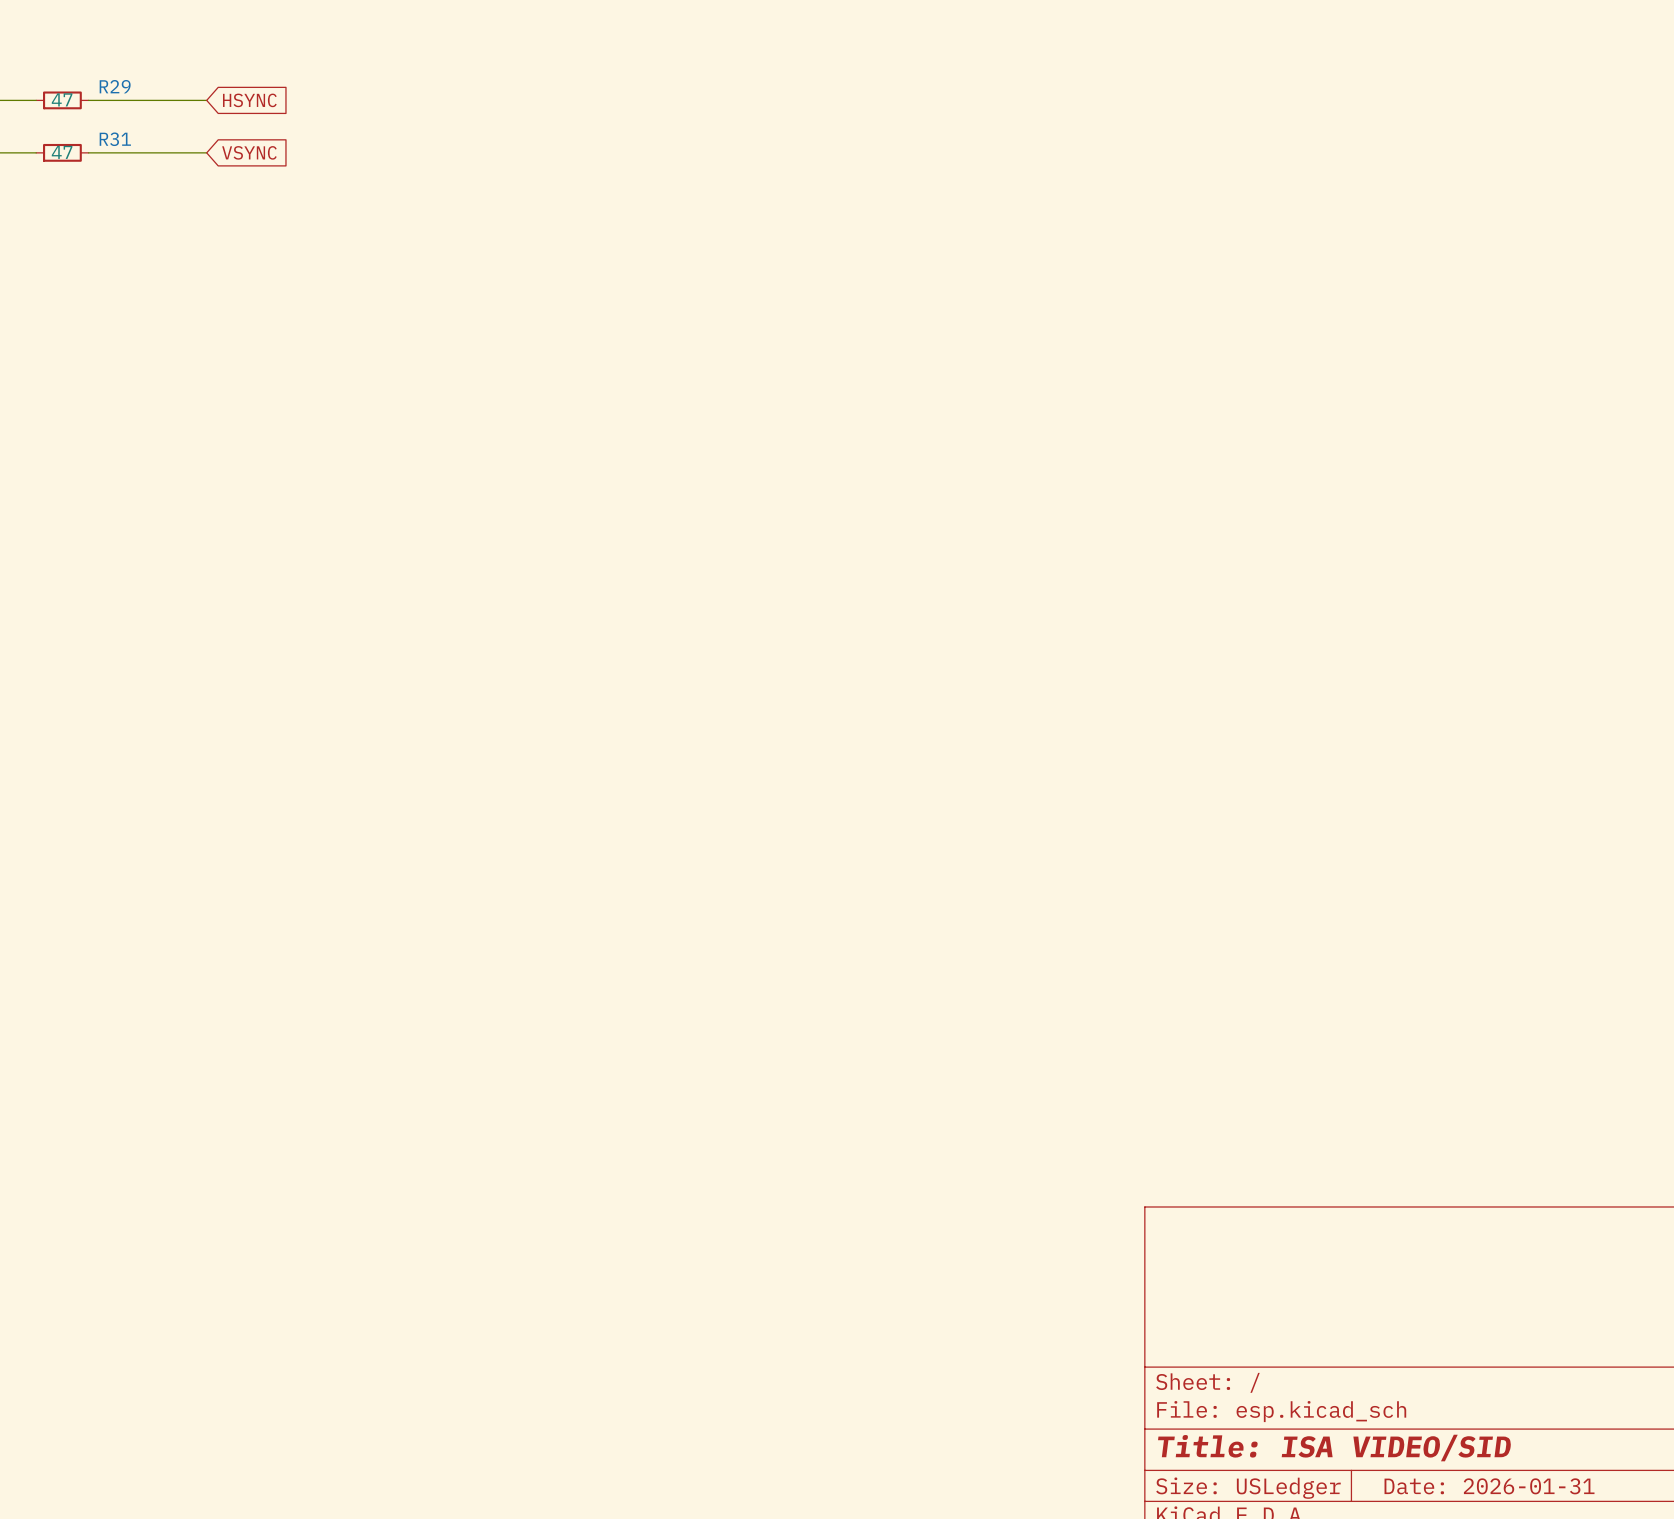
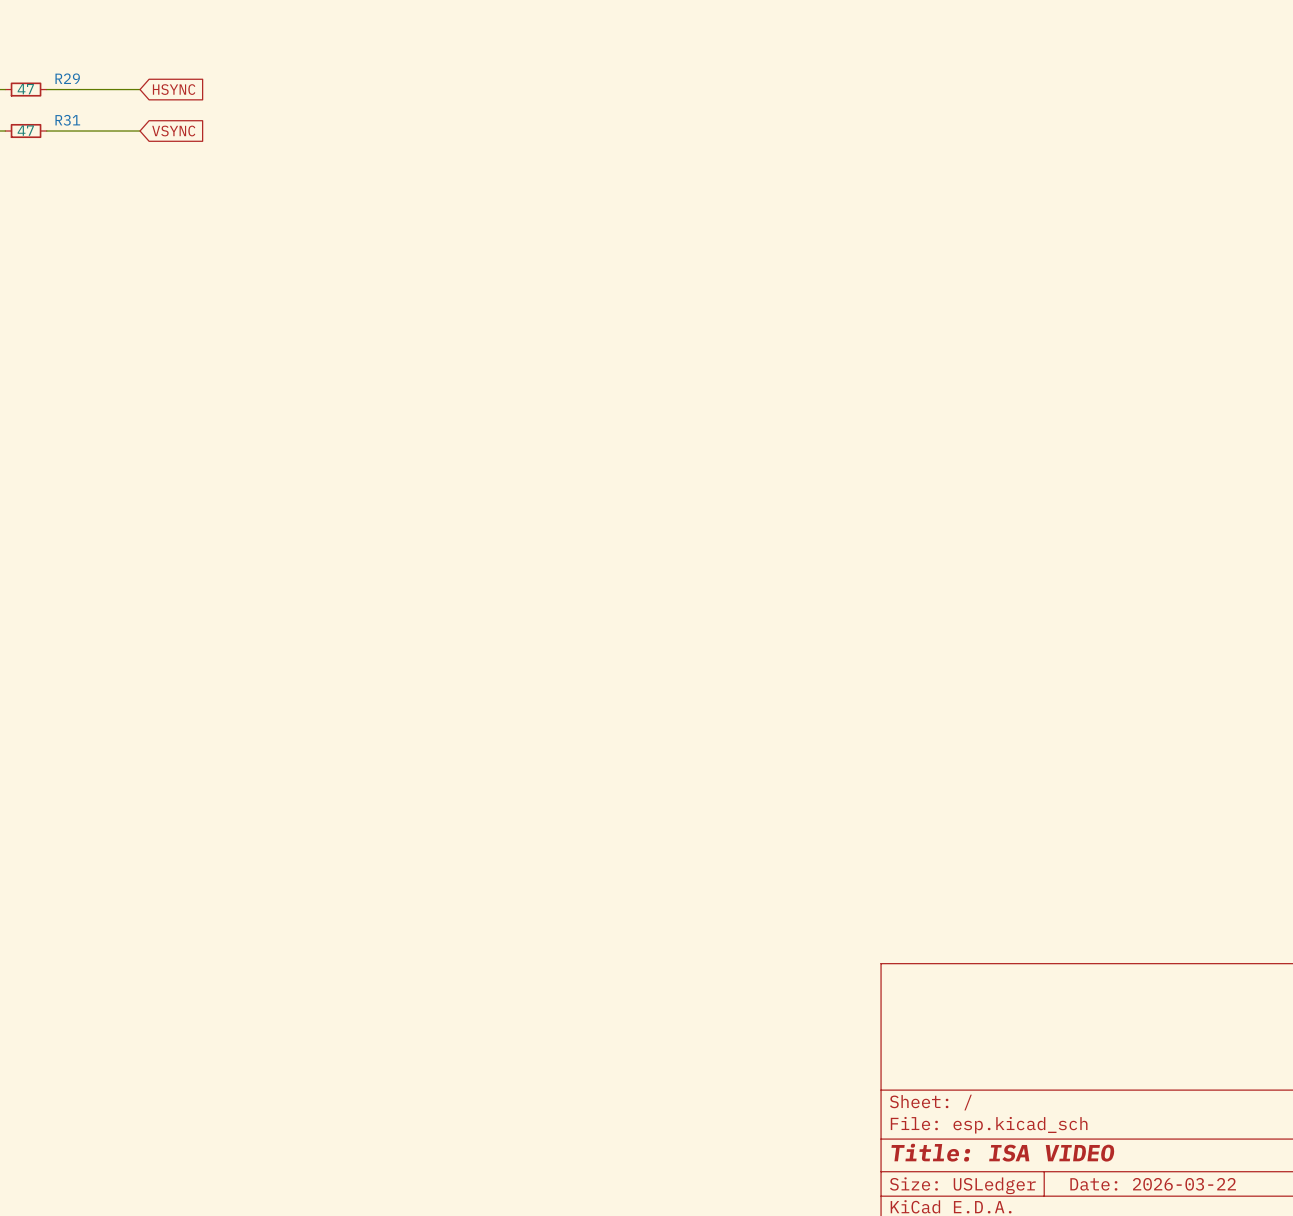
title block: Title: ISA VIDEO/SID (1334, 1448) -> Title: ISA VIDEO (1002, 1152)
title block: Date: 2026-01-31 (1489, 1486) -> Date: 2026-03-22 (1153, 1184)

